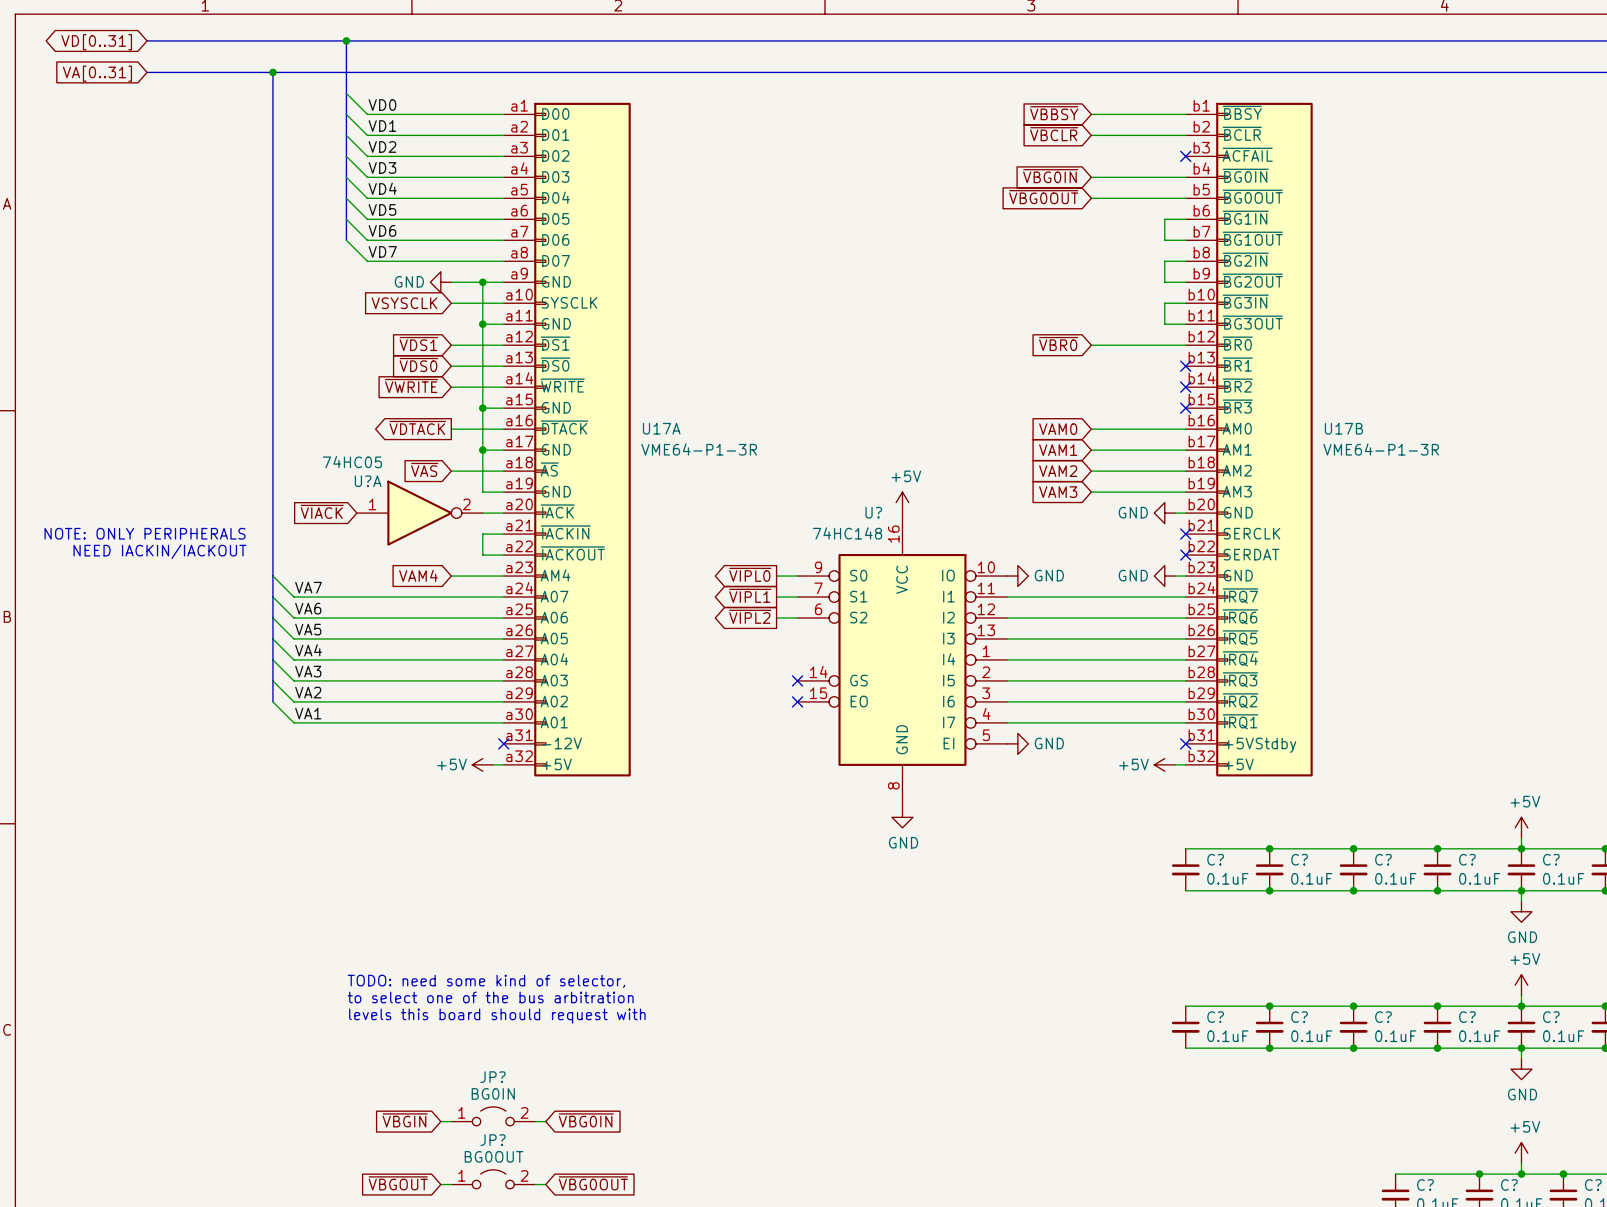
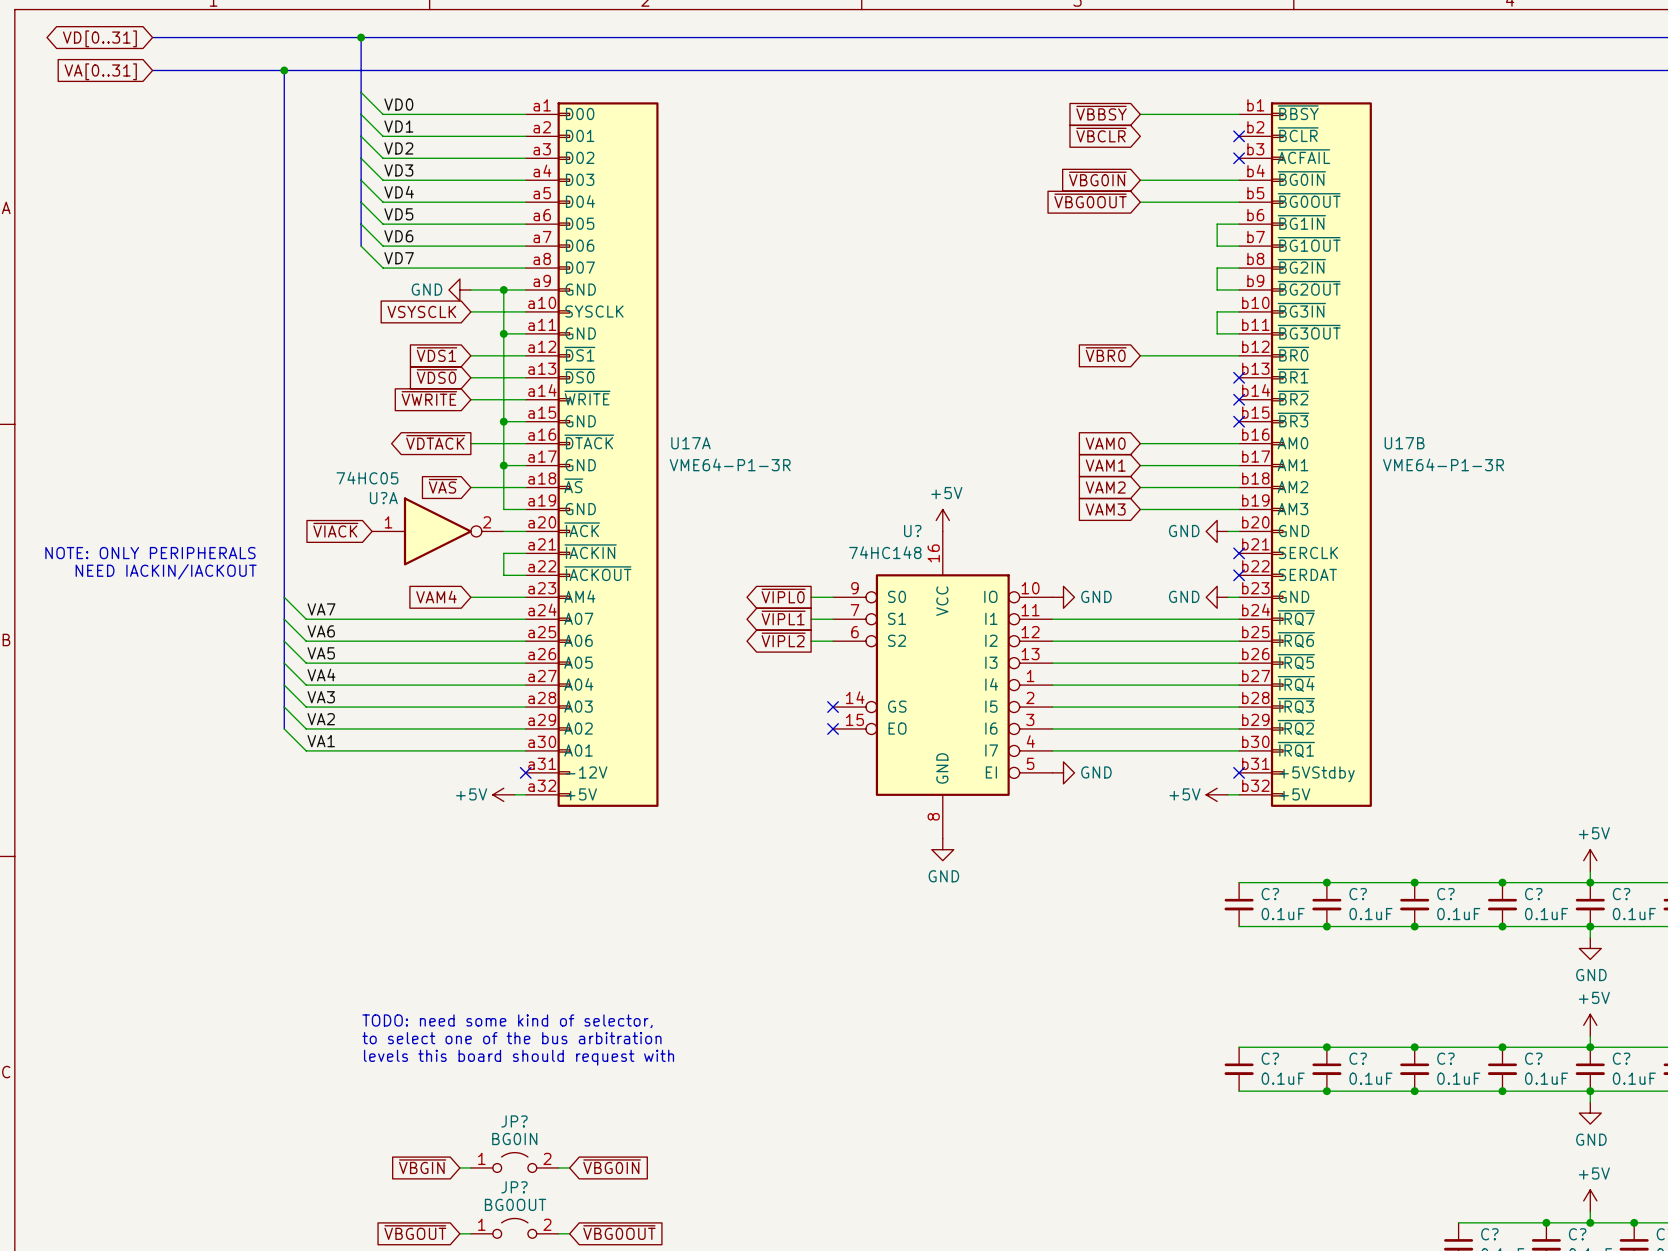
wire: (1091, 135) (1185, 135) -> none
no-connect mark: none -> (1239, 136)

